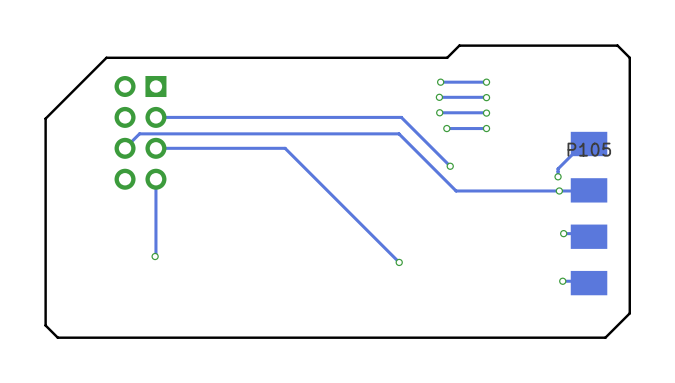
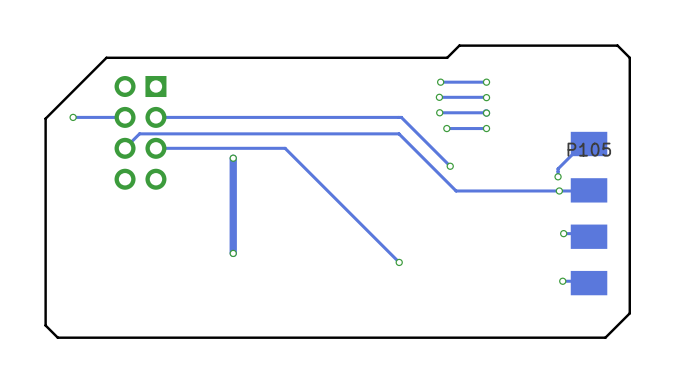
via: none -> (73, 117)
track: none -> (125, 117) (73, 117)
track: none -> (233, 158) (233, 253)
via: none -> (233, 158)
track: (155, 179) (155, 256) -> none
via: none -> (233, 253)
via: (155, 256) -> none

